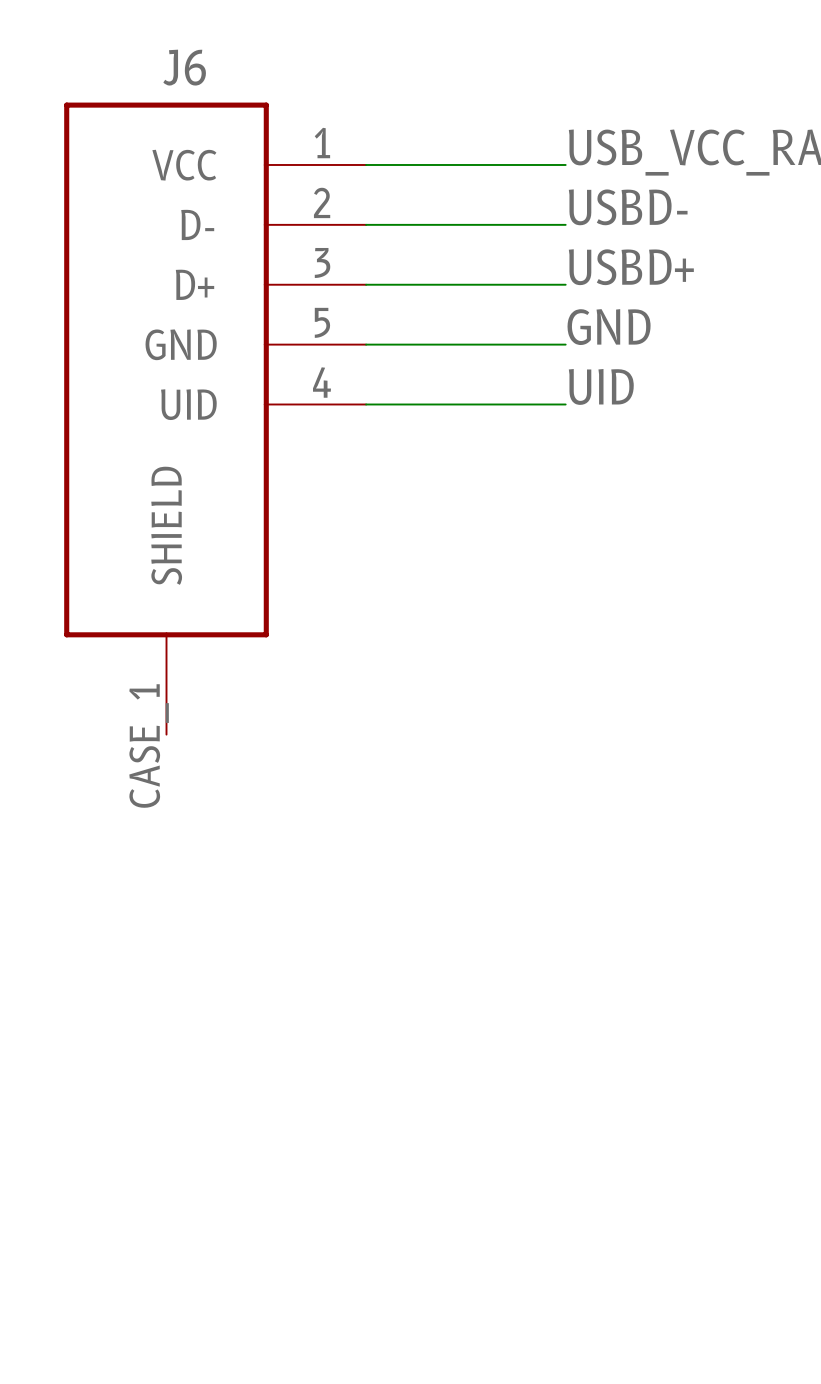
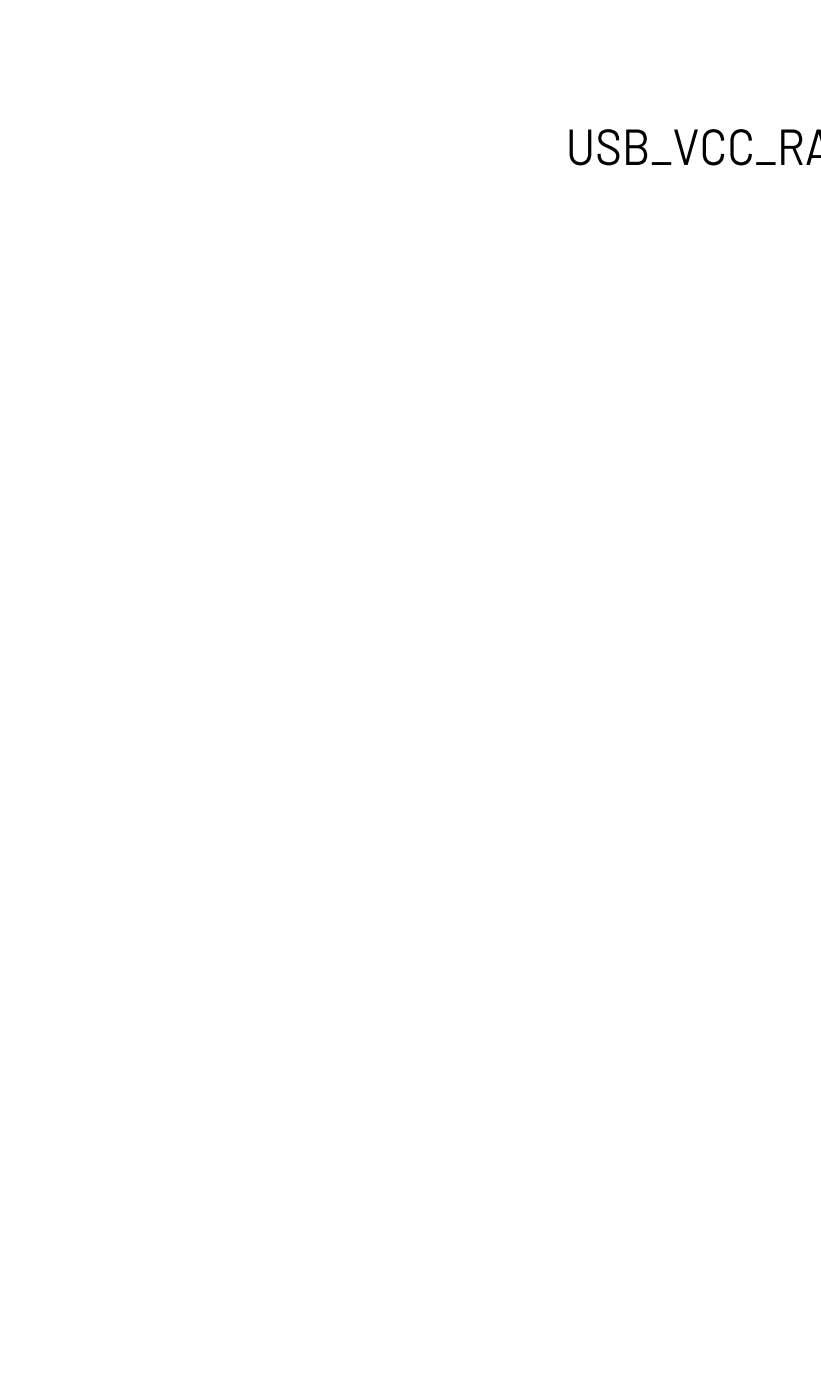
wire: (366, 164) (565, 164) -> none
label: USBD- (628, 207) -> none
wire: (366, 224) (565, 224) -> none
label: USBD+ (631, 267) -> none
wire: (366, 284) (565, 284) -> none
label: GND (609, 327) -> none
wire: (366, 344) (565, 344) -> none
label: UID (601, 386) -> none
wire: (366, 404) (565, 404) -> none
J6: (215, 418) -> none

